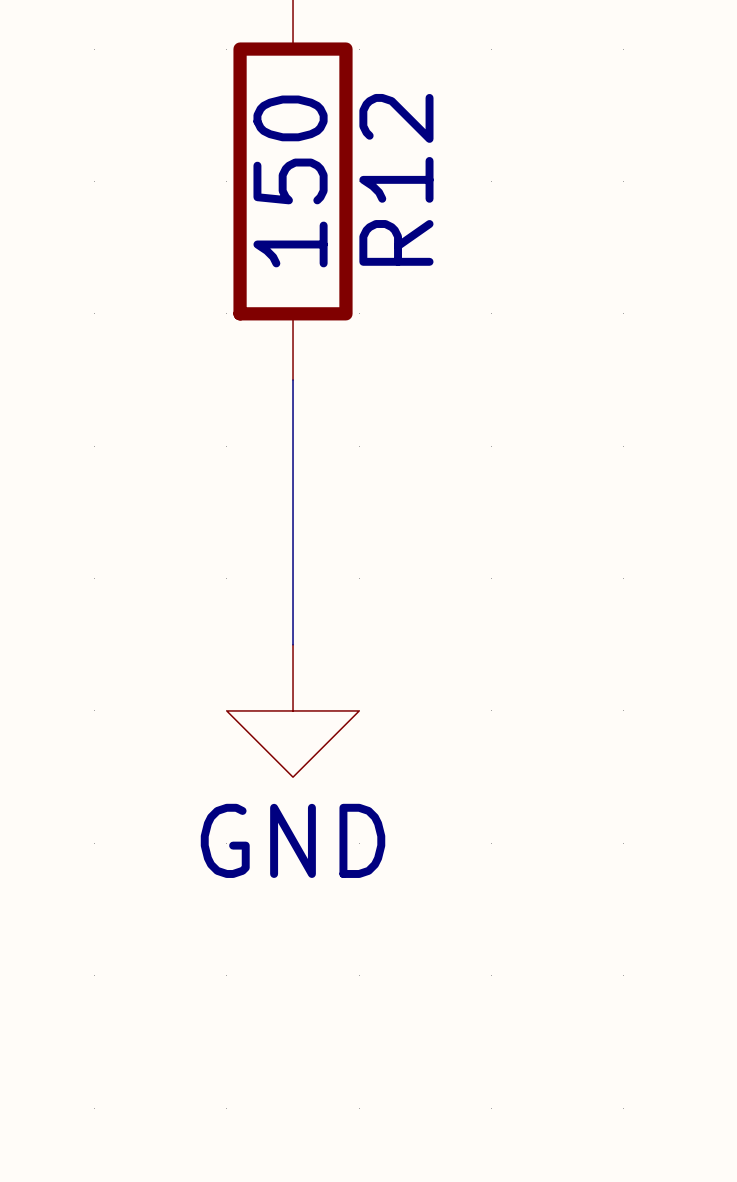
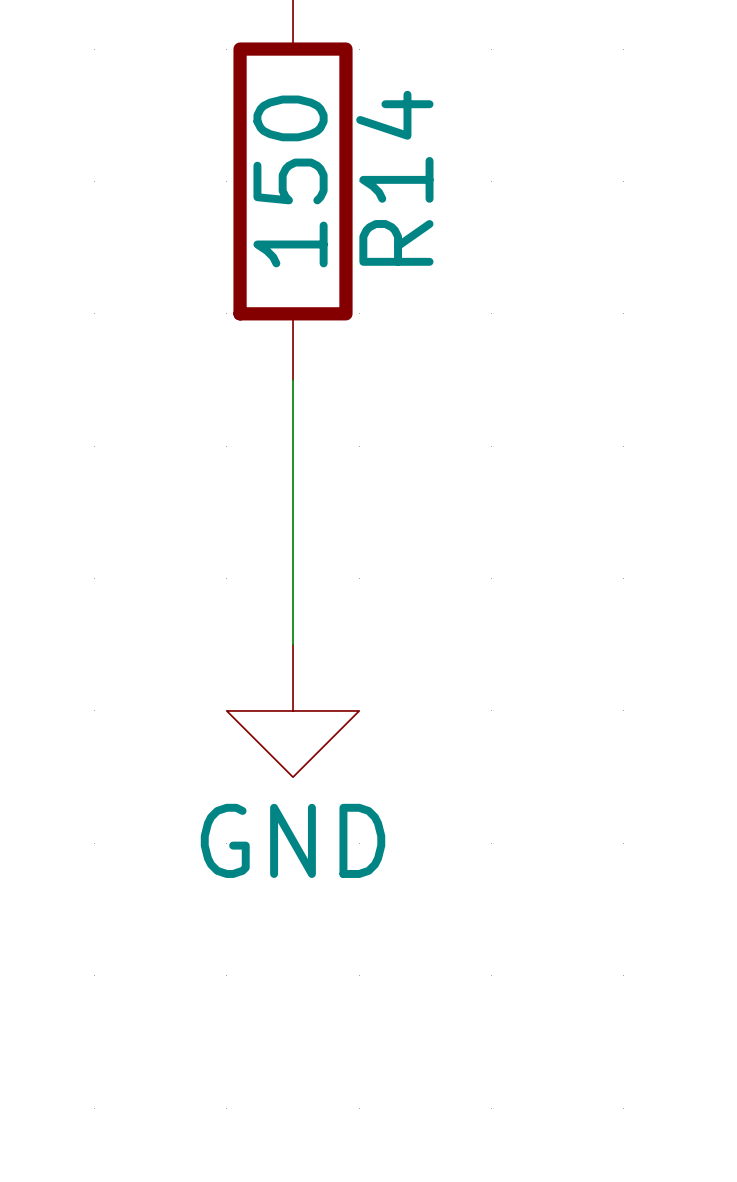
R12 name: R12 (396, 179) -> R14 (394, 178)

